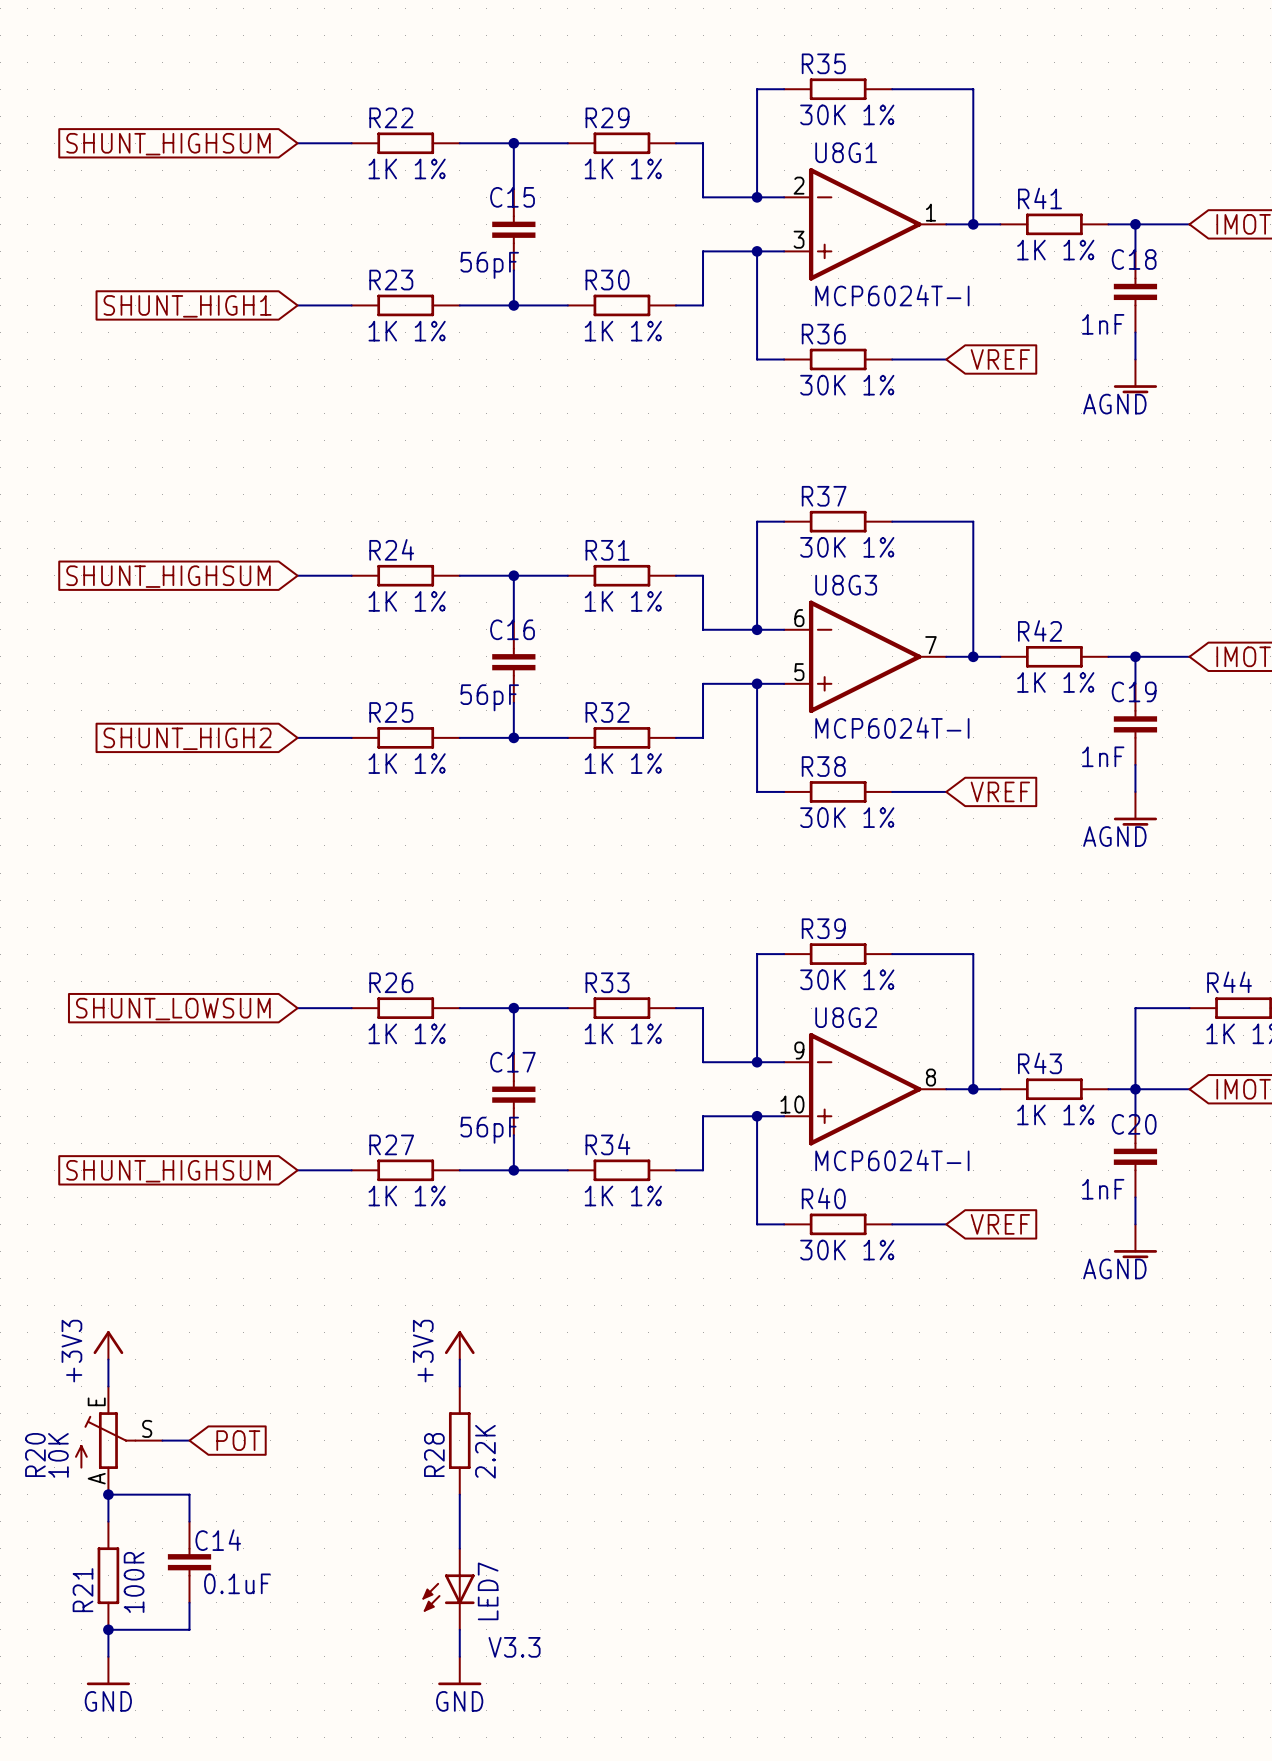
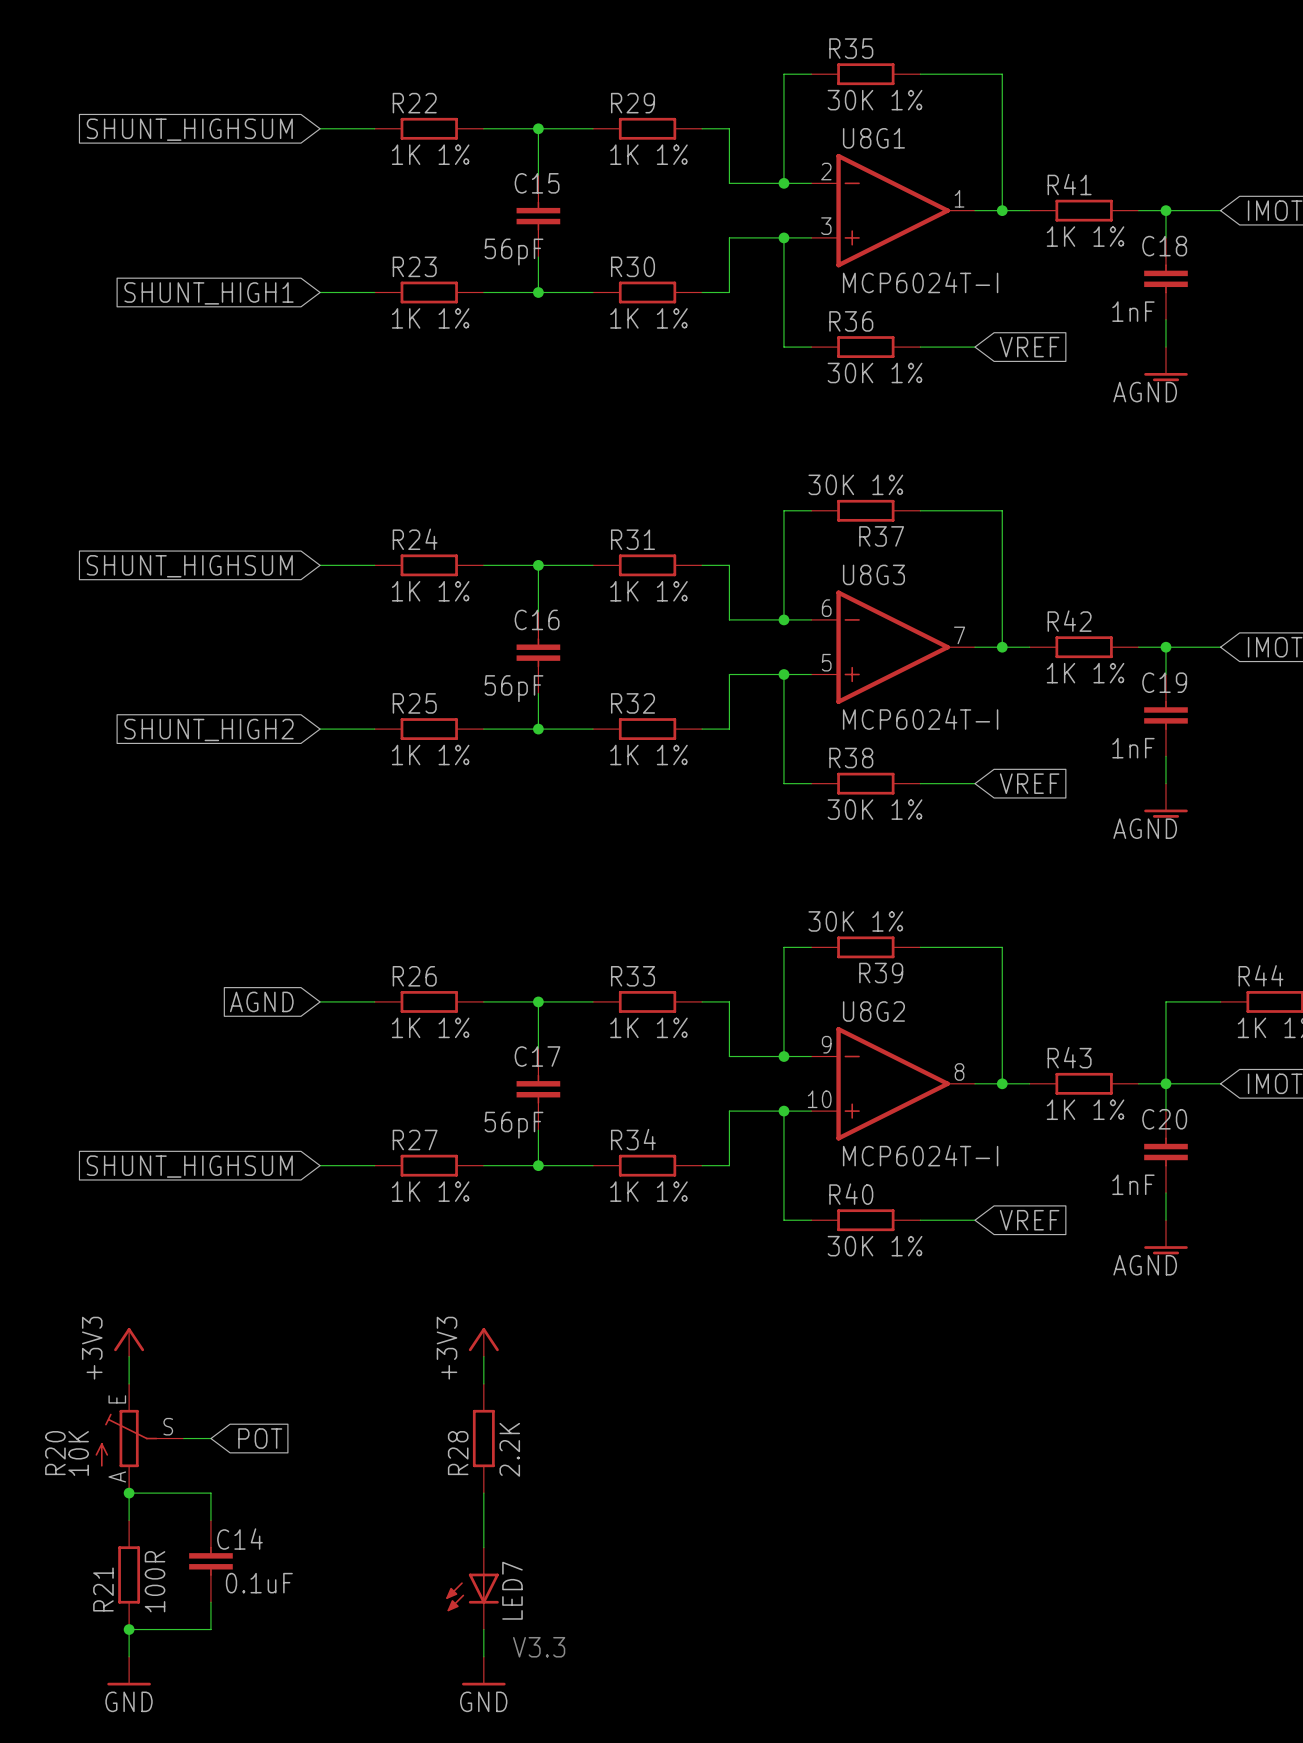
R37 name position: R37 (824, 496) -> R37 (881, 536)
R37 value position: 30K 1% (847, 547) -> 30K 1% (855, 484)
R39 name position: R39 (823, 928) -> R39 (881, 973)
R39 value position: 30K 1% (847, 979) -> 30K 1% (855, 921)
global label: SHUNT_LOWSUM (173, 1009) -> AGND (261, 1001)

